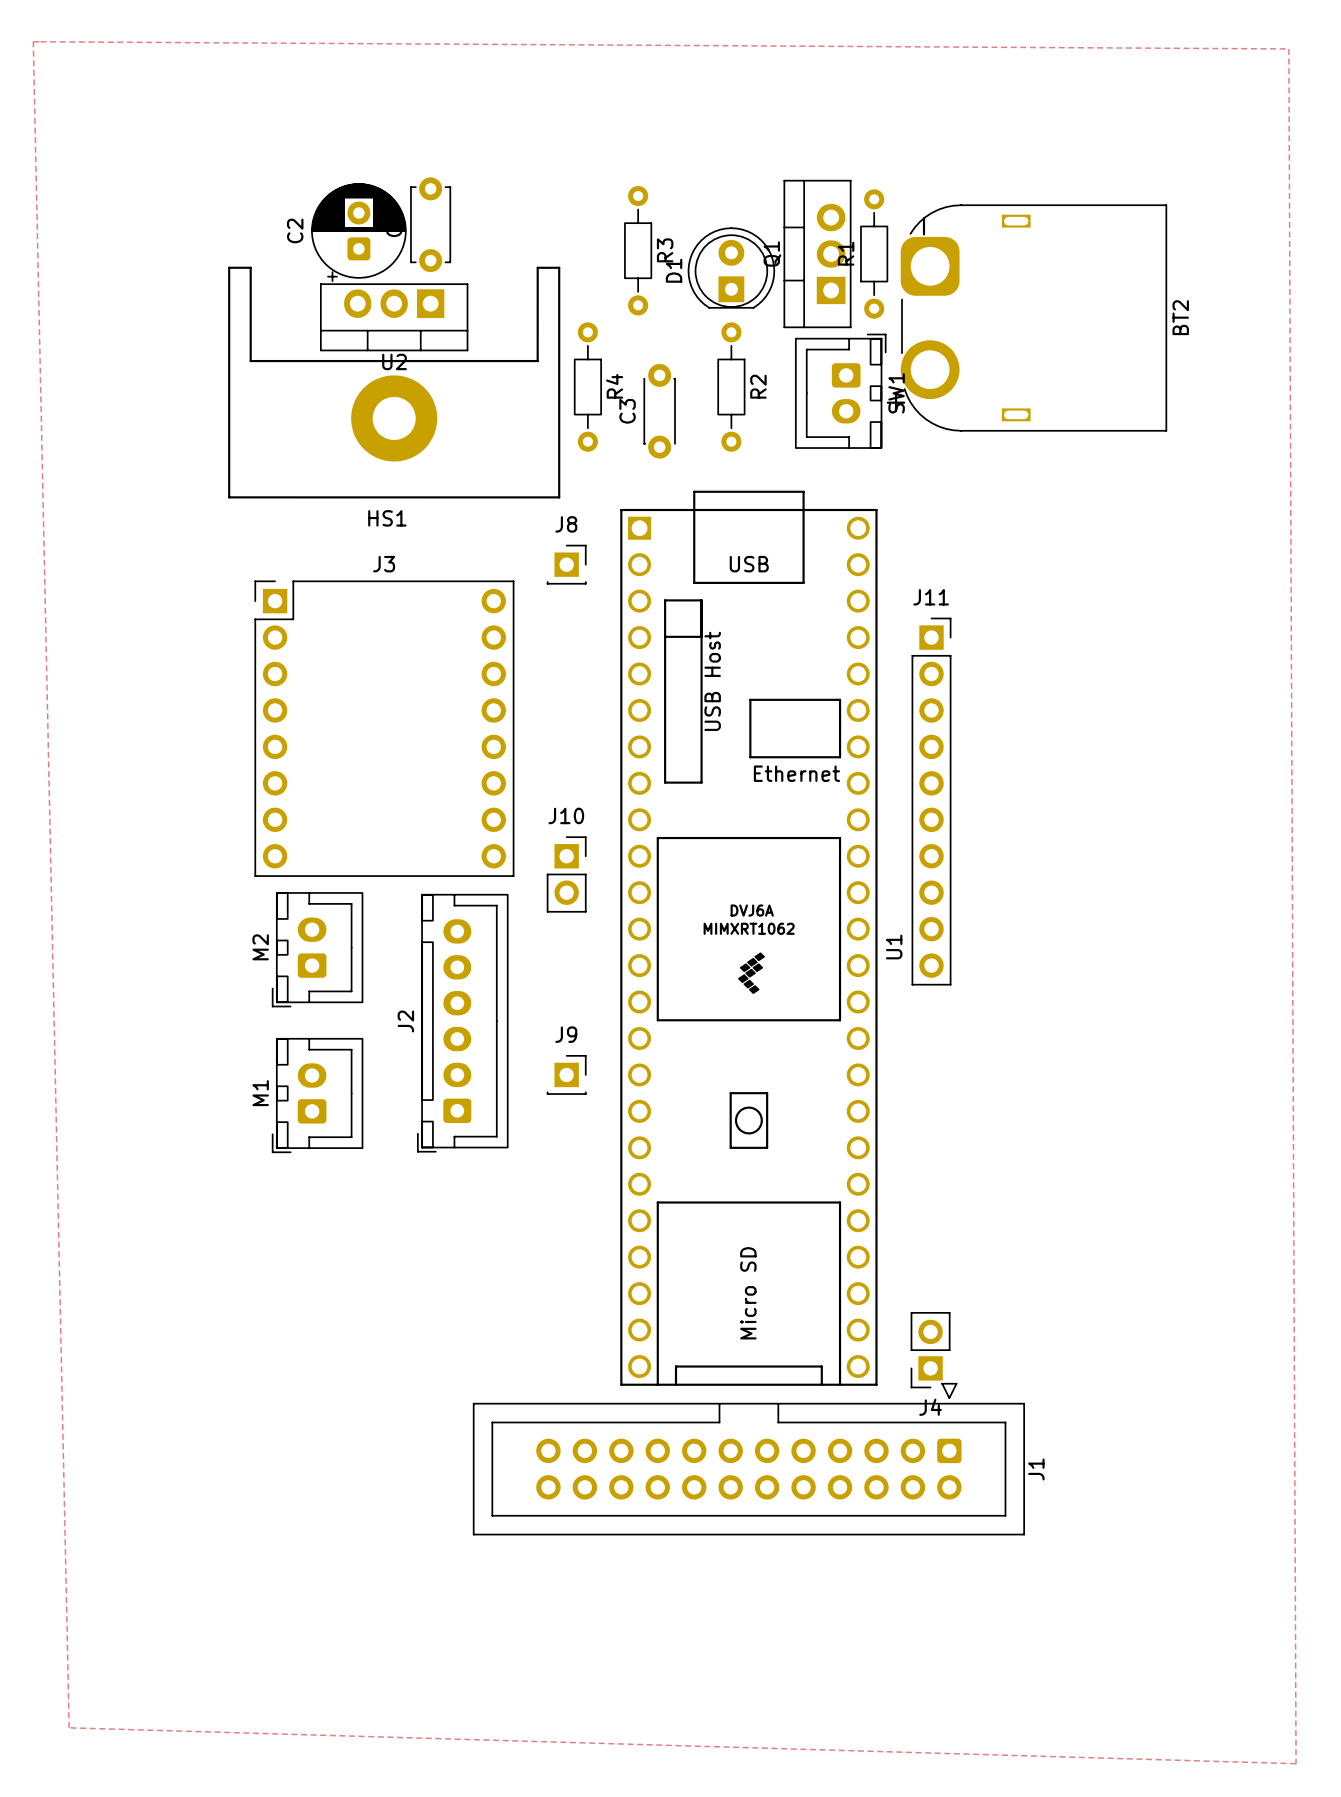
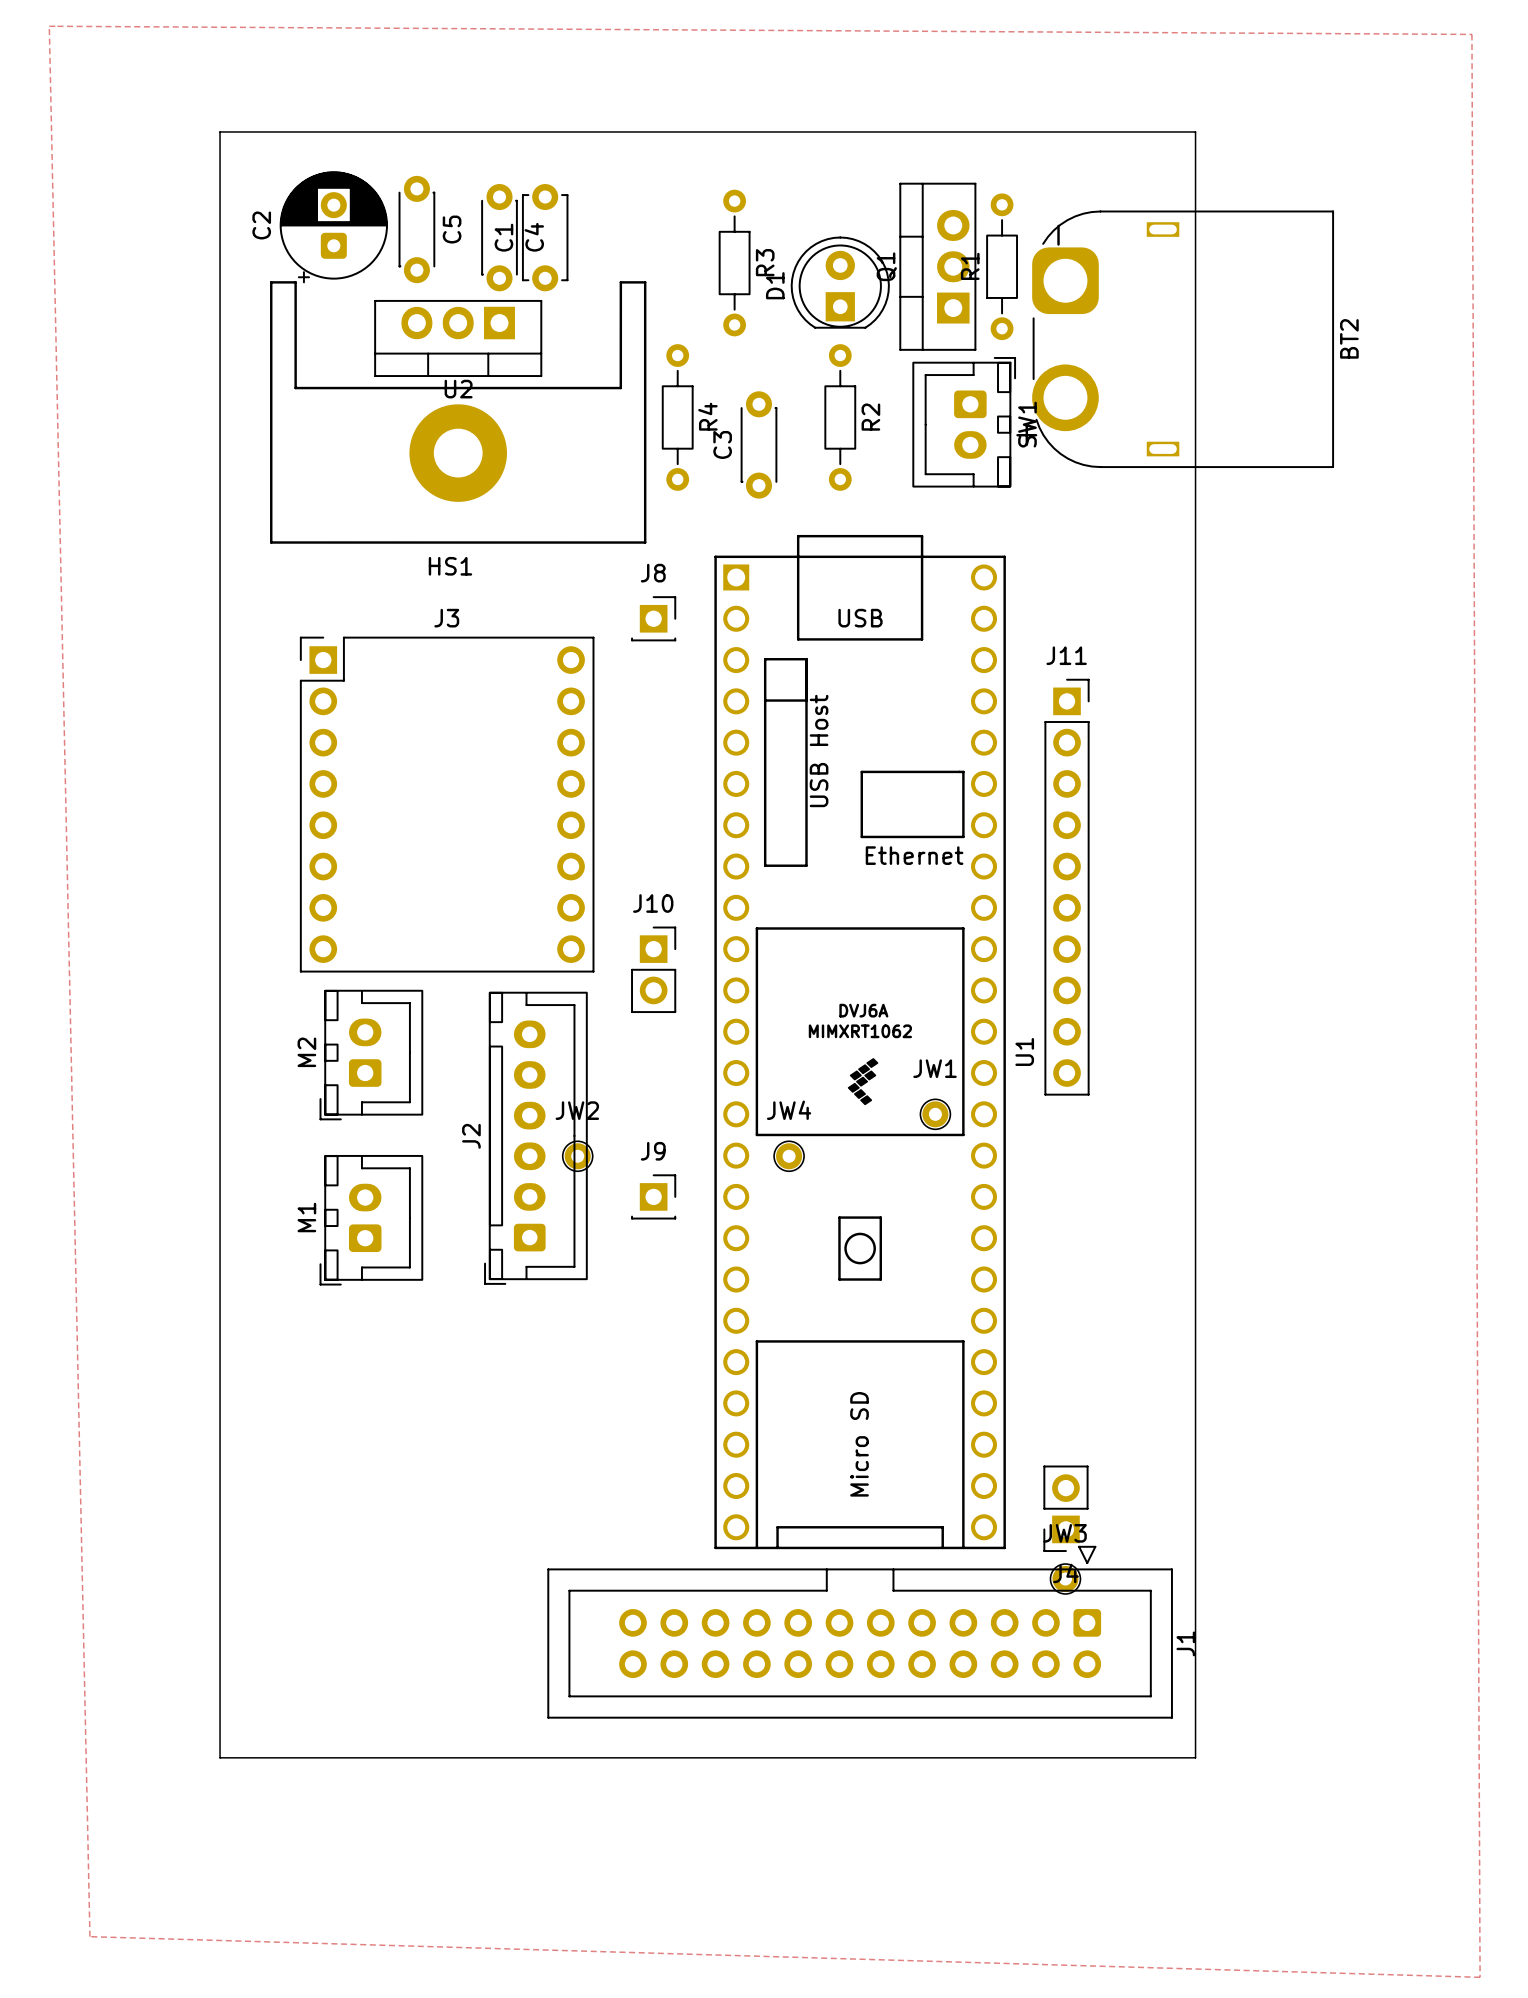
board edge: none -> (220, 131) (1195, 131) (1195, 1757) (220, 1757) (220, 131)
C5: none -> (416, 229)
C1 position: (430, 224) -> (545, 237)
C4: none -> (499, 237)
C2 position: (358, 232) -> (333, 227)
JW1: none -> (935, 1114)
JW2: none -> (577, 1156)
JW4: none -> (789, 1156)
JW3: none -> (1065, 1578)

